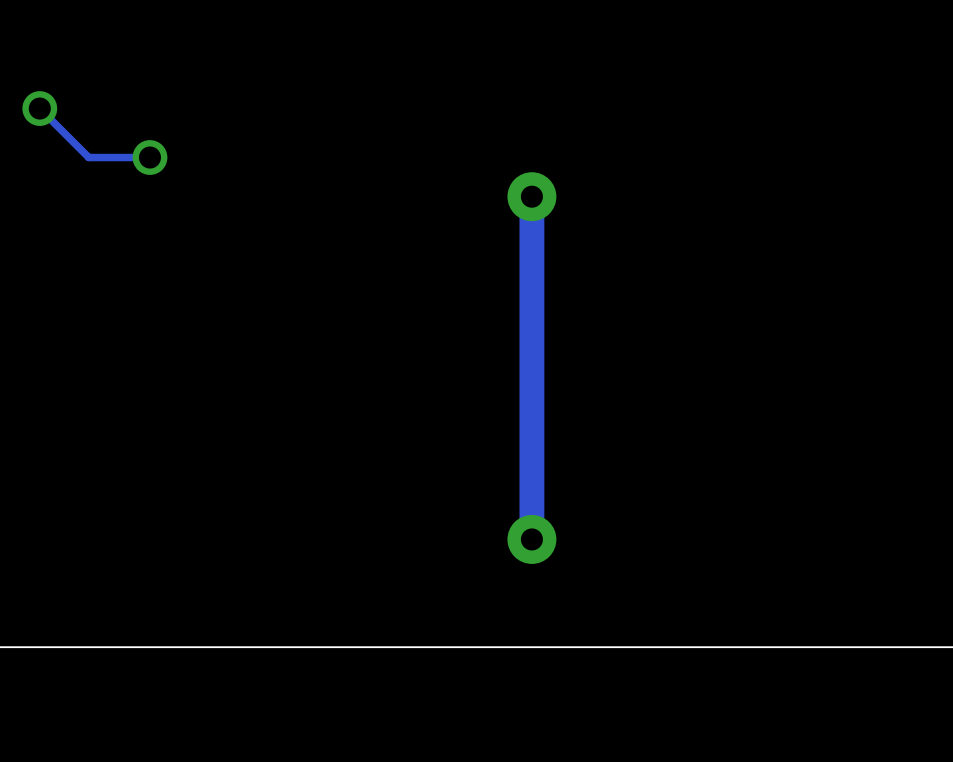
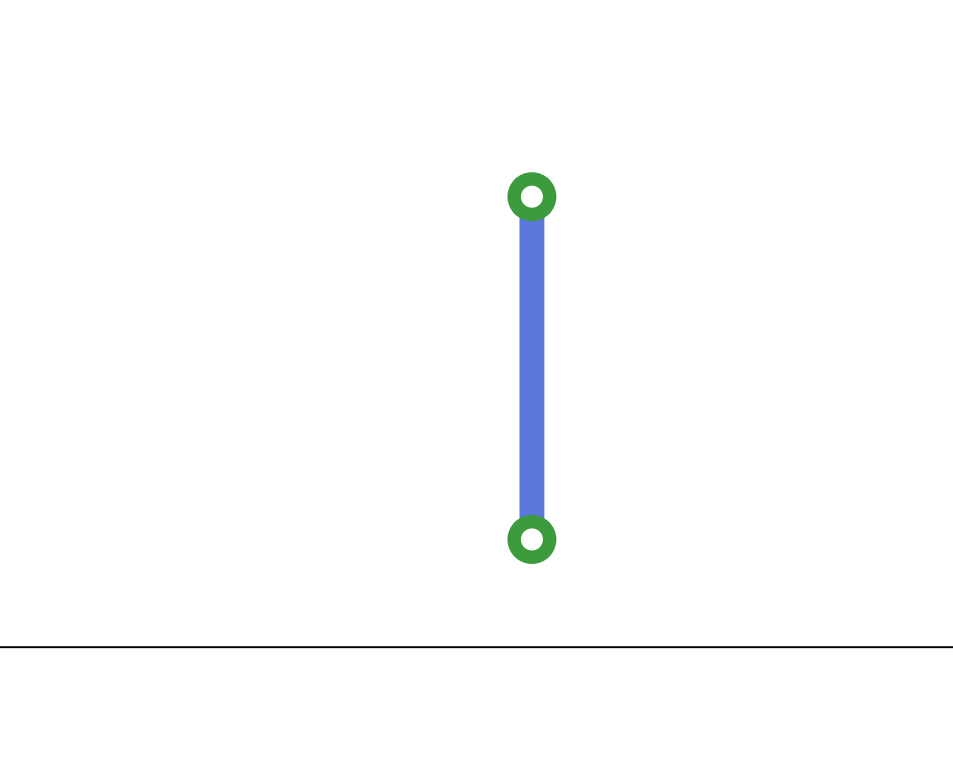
track: (39, 108) (88, 157) (149, 157) -> none
via: (39, 108) -> none
via: (149, 157) -> none

